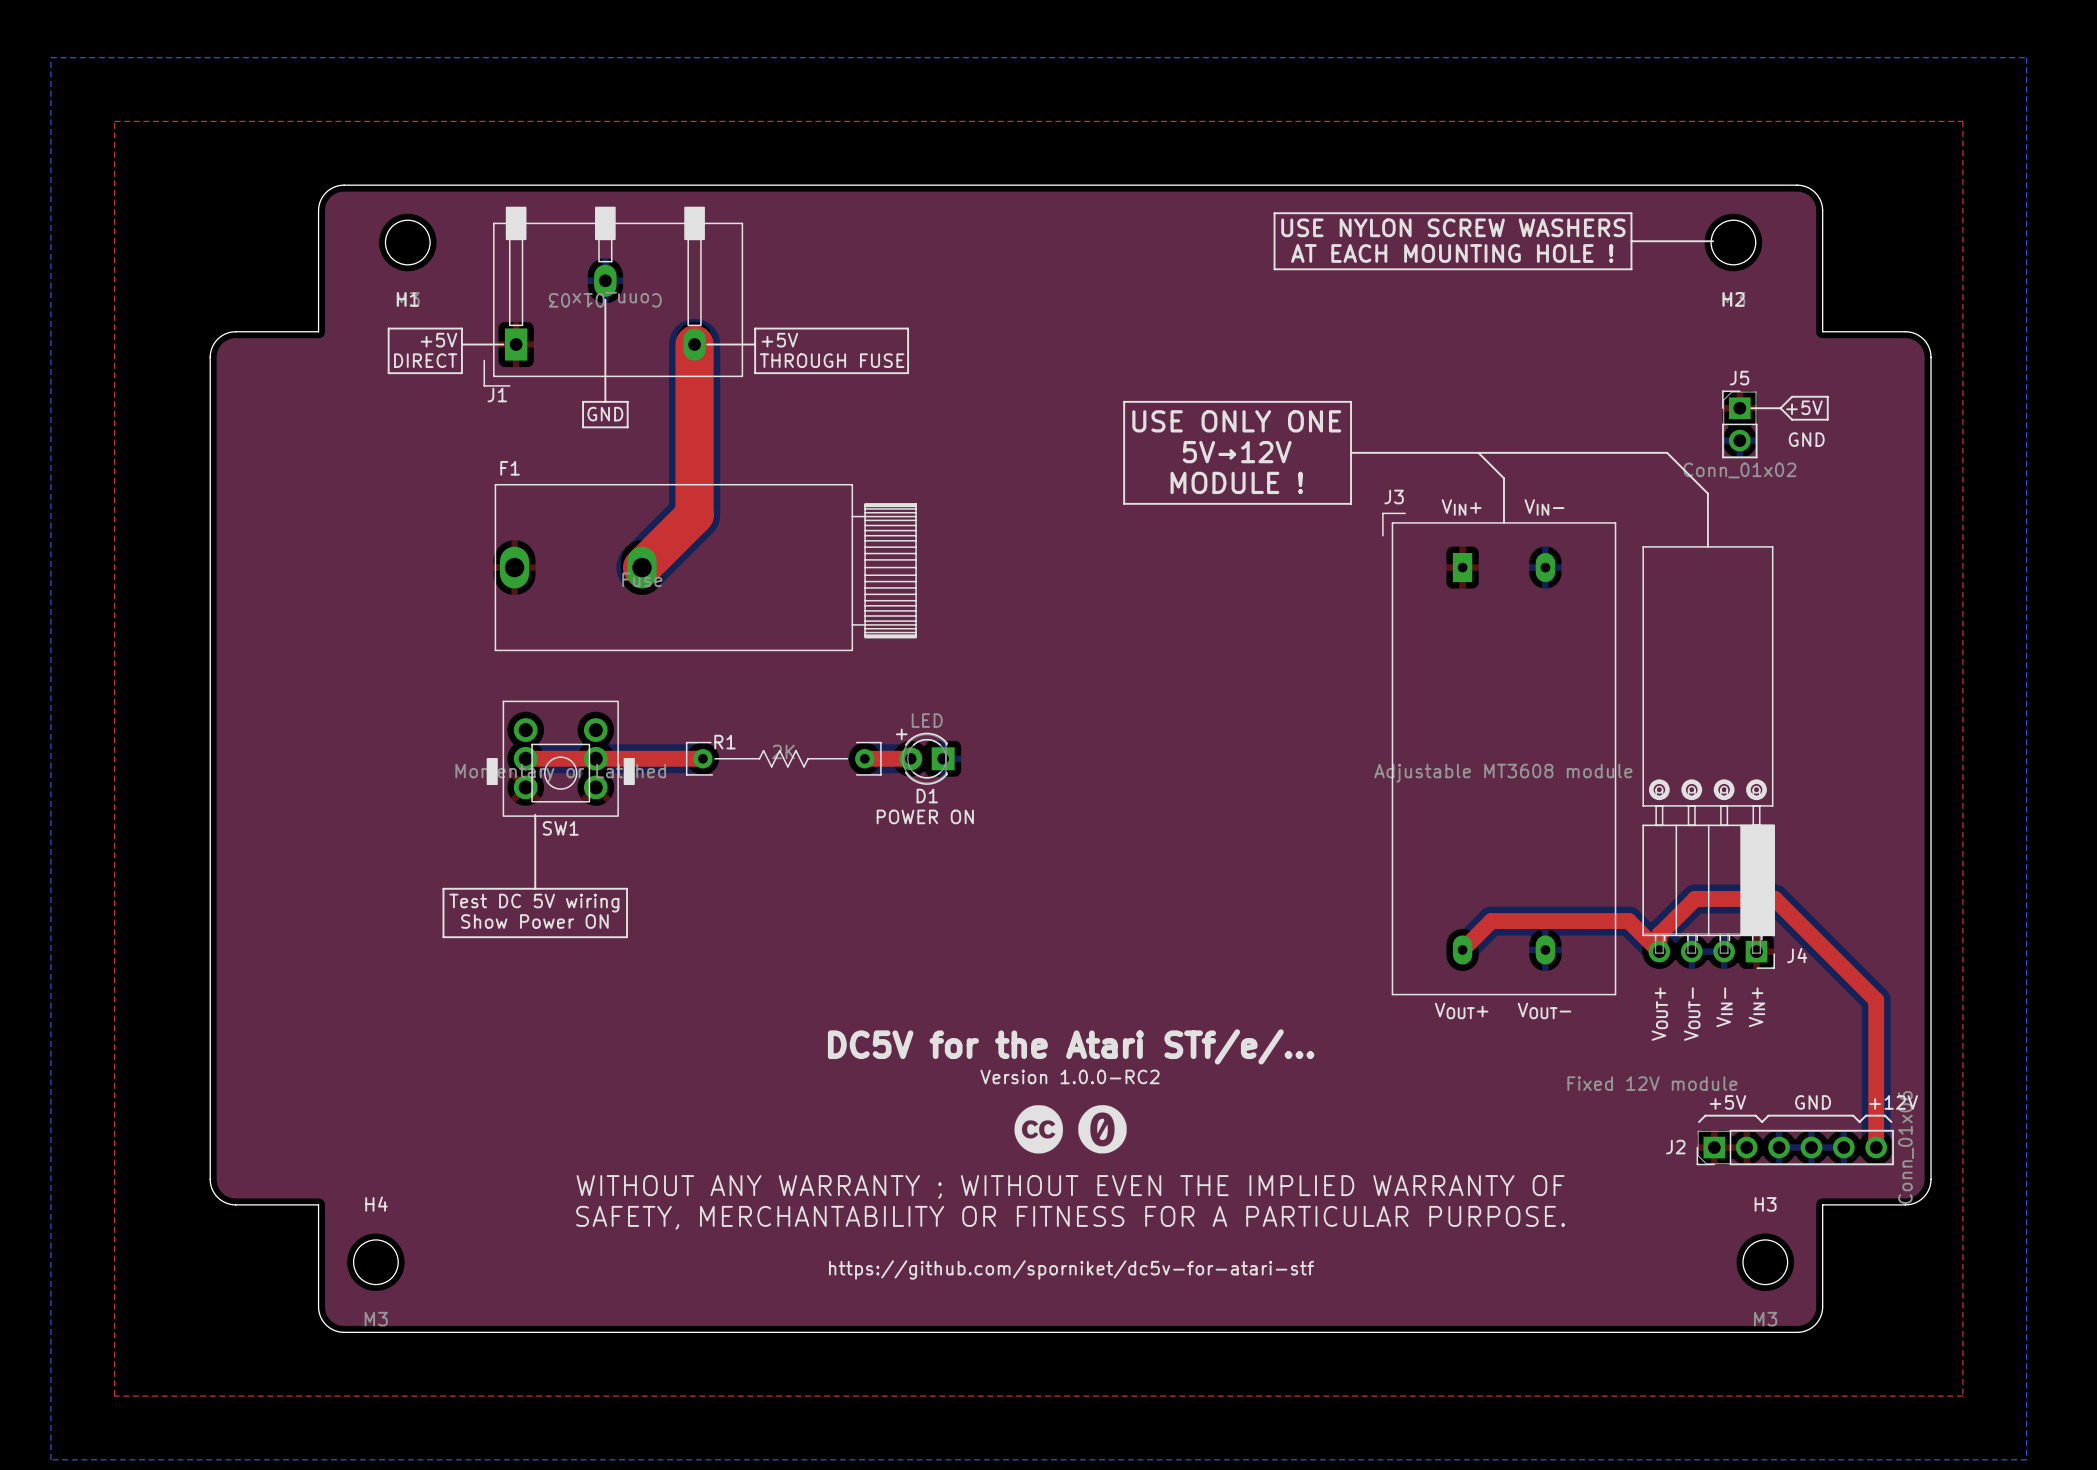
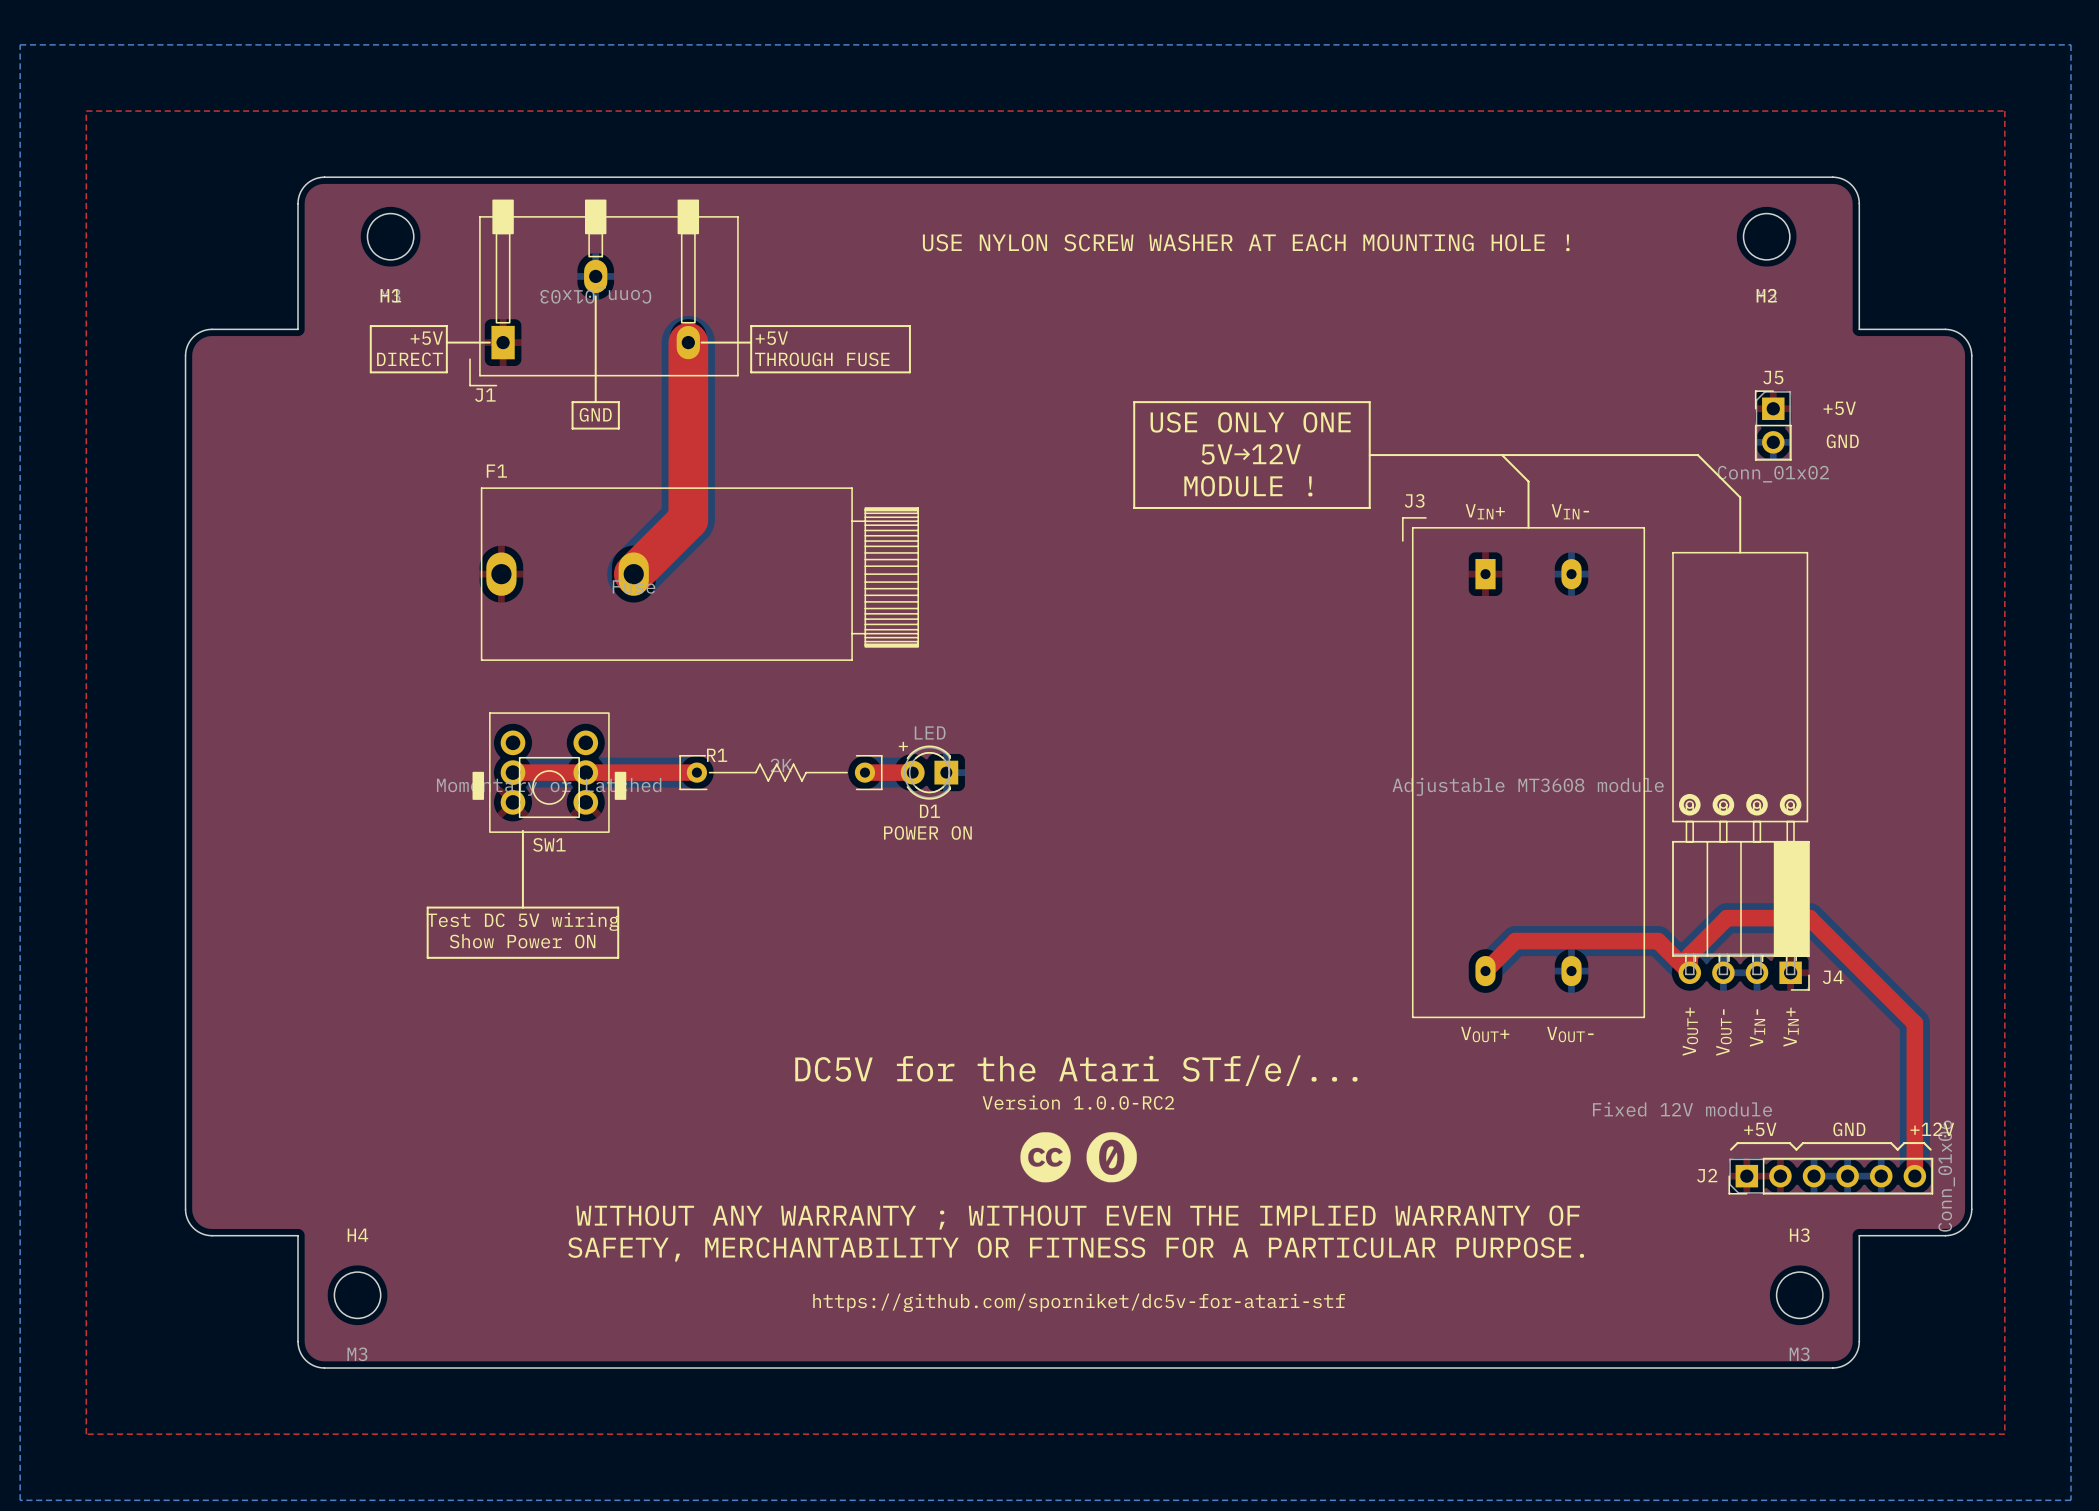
line: (1274, 213) (1631, 213) (1631, 269) (1274, 269) (1274, 213) -> none
text: USE NYLON SCREW WASHERS (1453, 227) -> none
line: (1631, 241) (1713, 241) -> none
text: none -> USE NYLON SCREW WASHER AT EACH MOUNTING HOLE ! (1246, 242)
text: AT EACH MOUNTING HOLE ! (1452, 253) -> none
line: (1751, 408) (1780, 408) -> none
line: (1780, 408) (1792, 419) (1827, 419) (1827, 396) (1792, 396) (1780, 408) -> none

